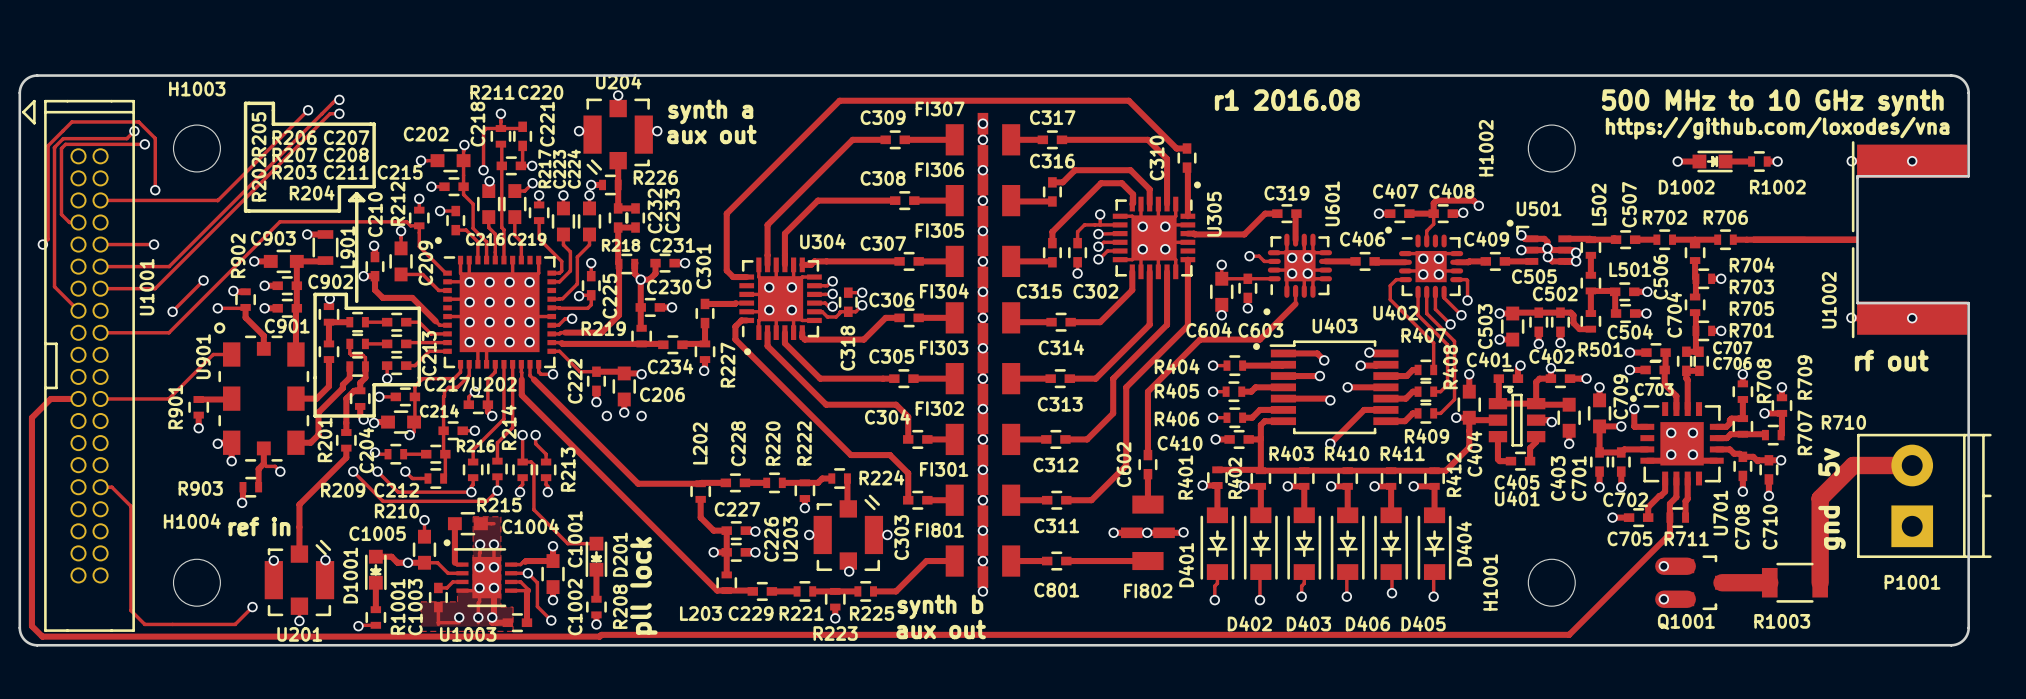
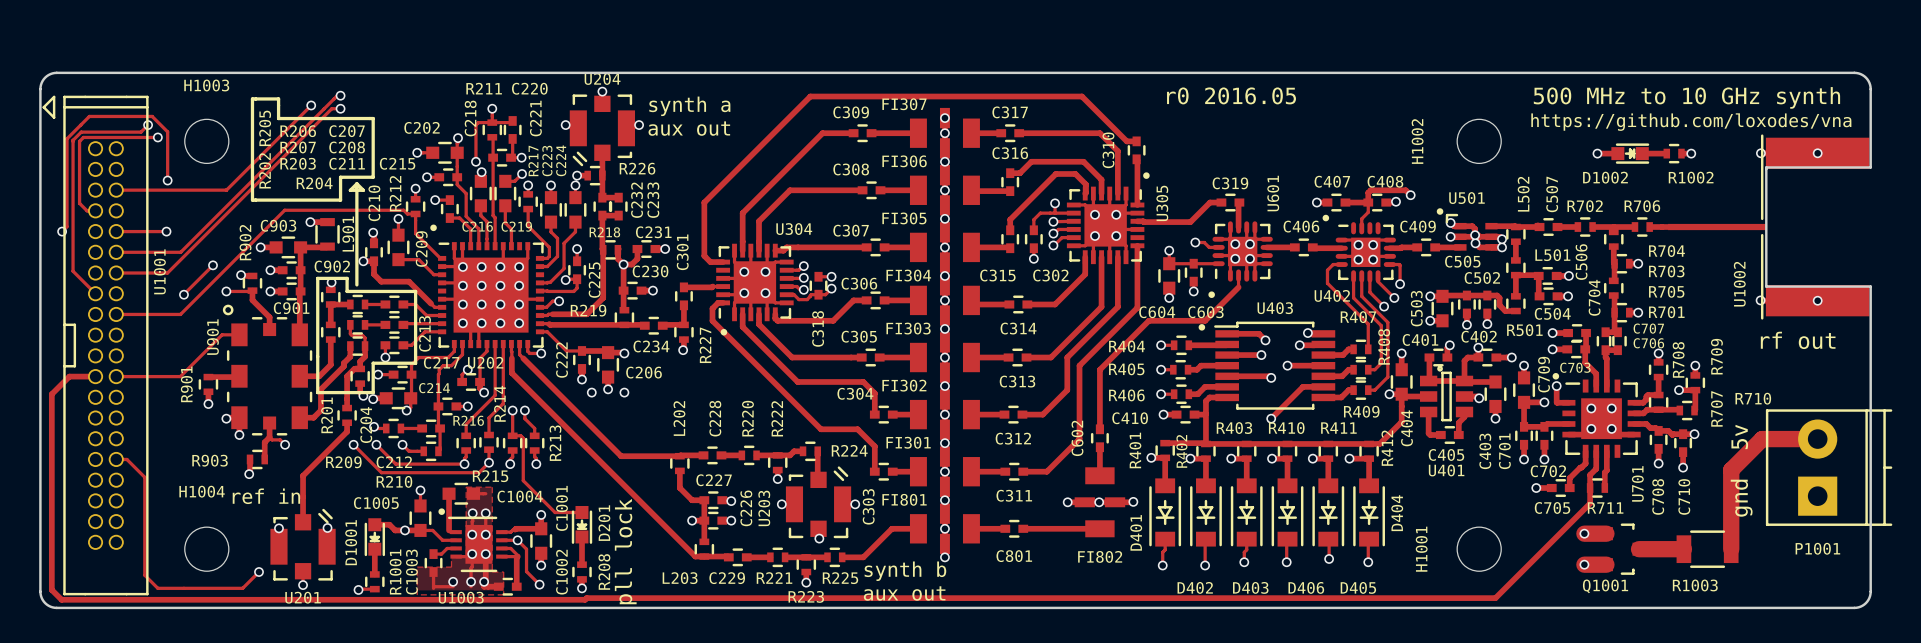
text: r1 2016.08 (1287, 100) -> r0 2016.05 (1231, 95)

